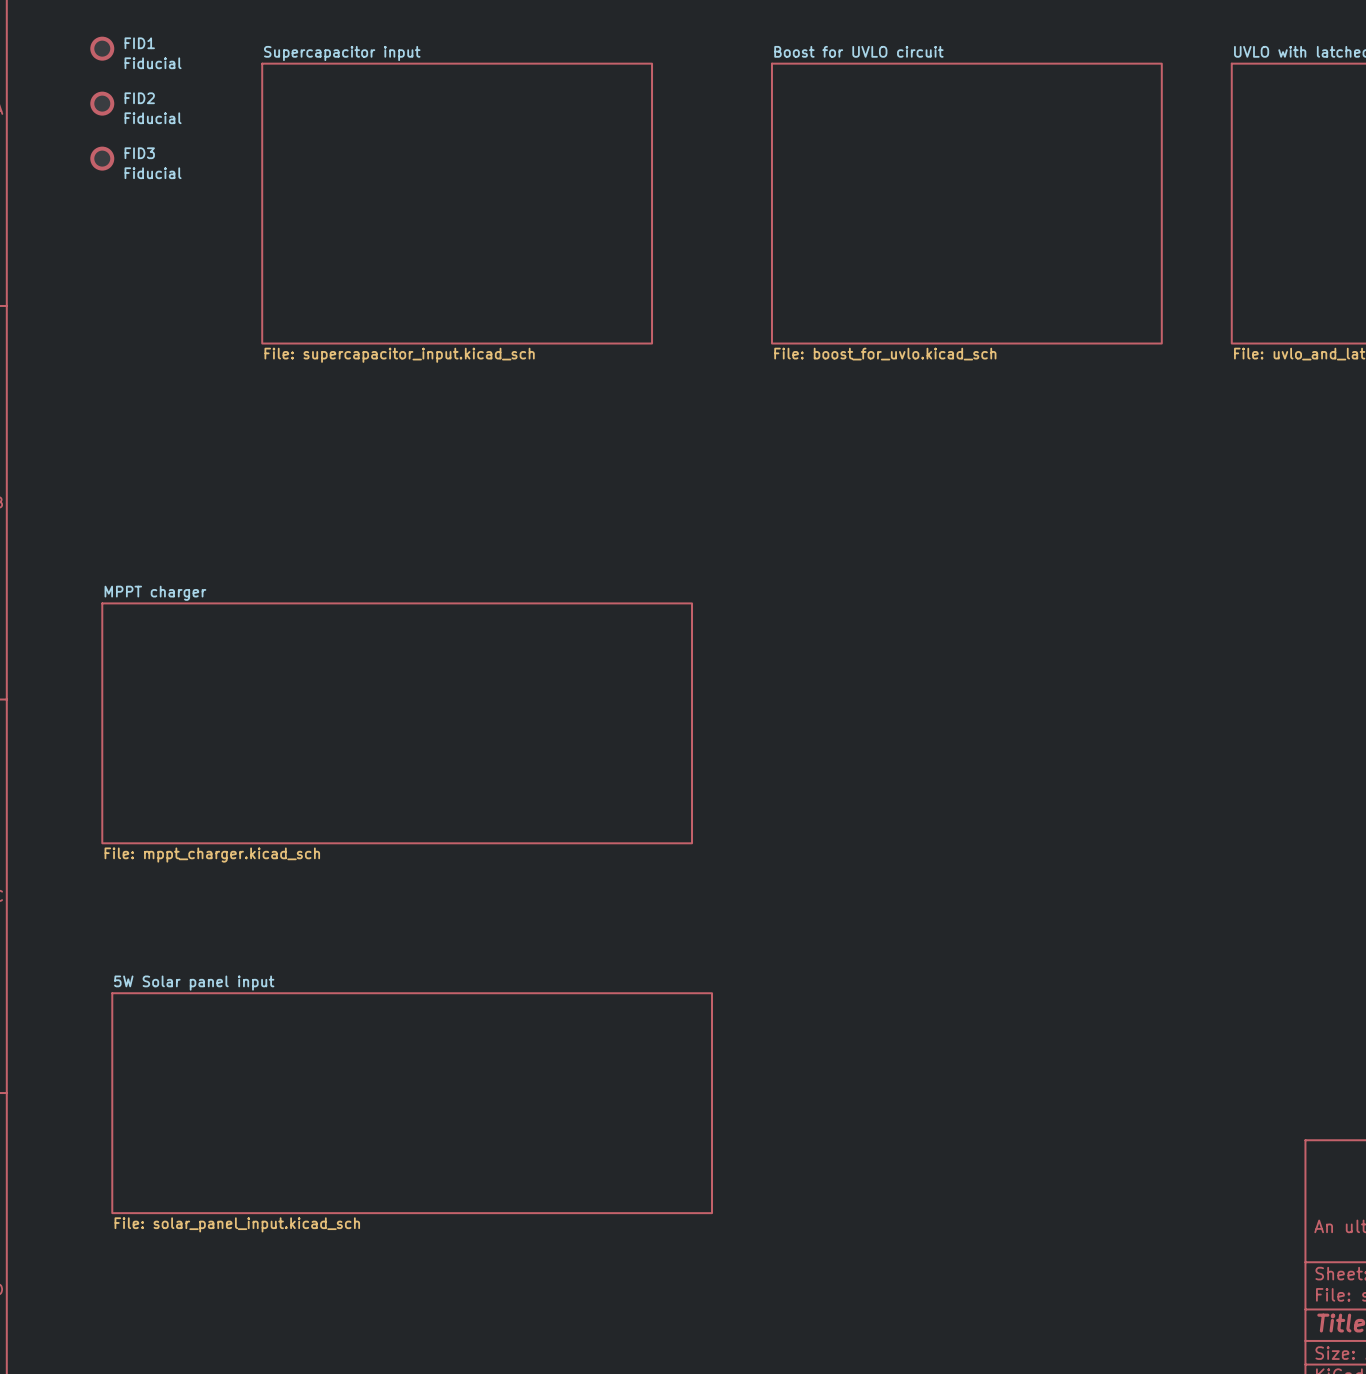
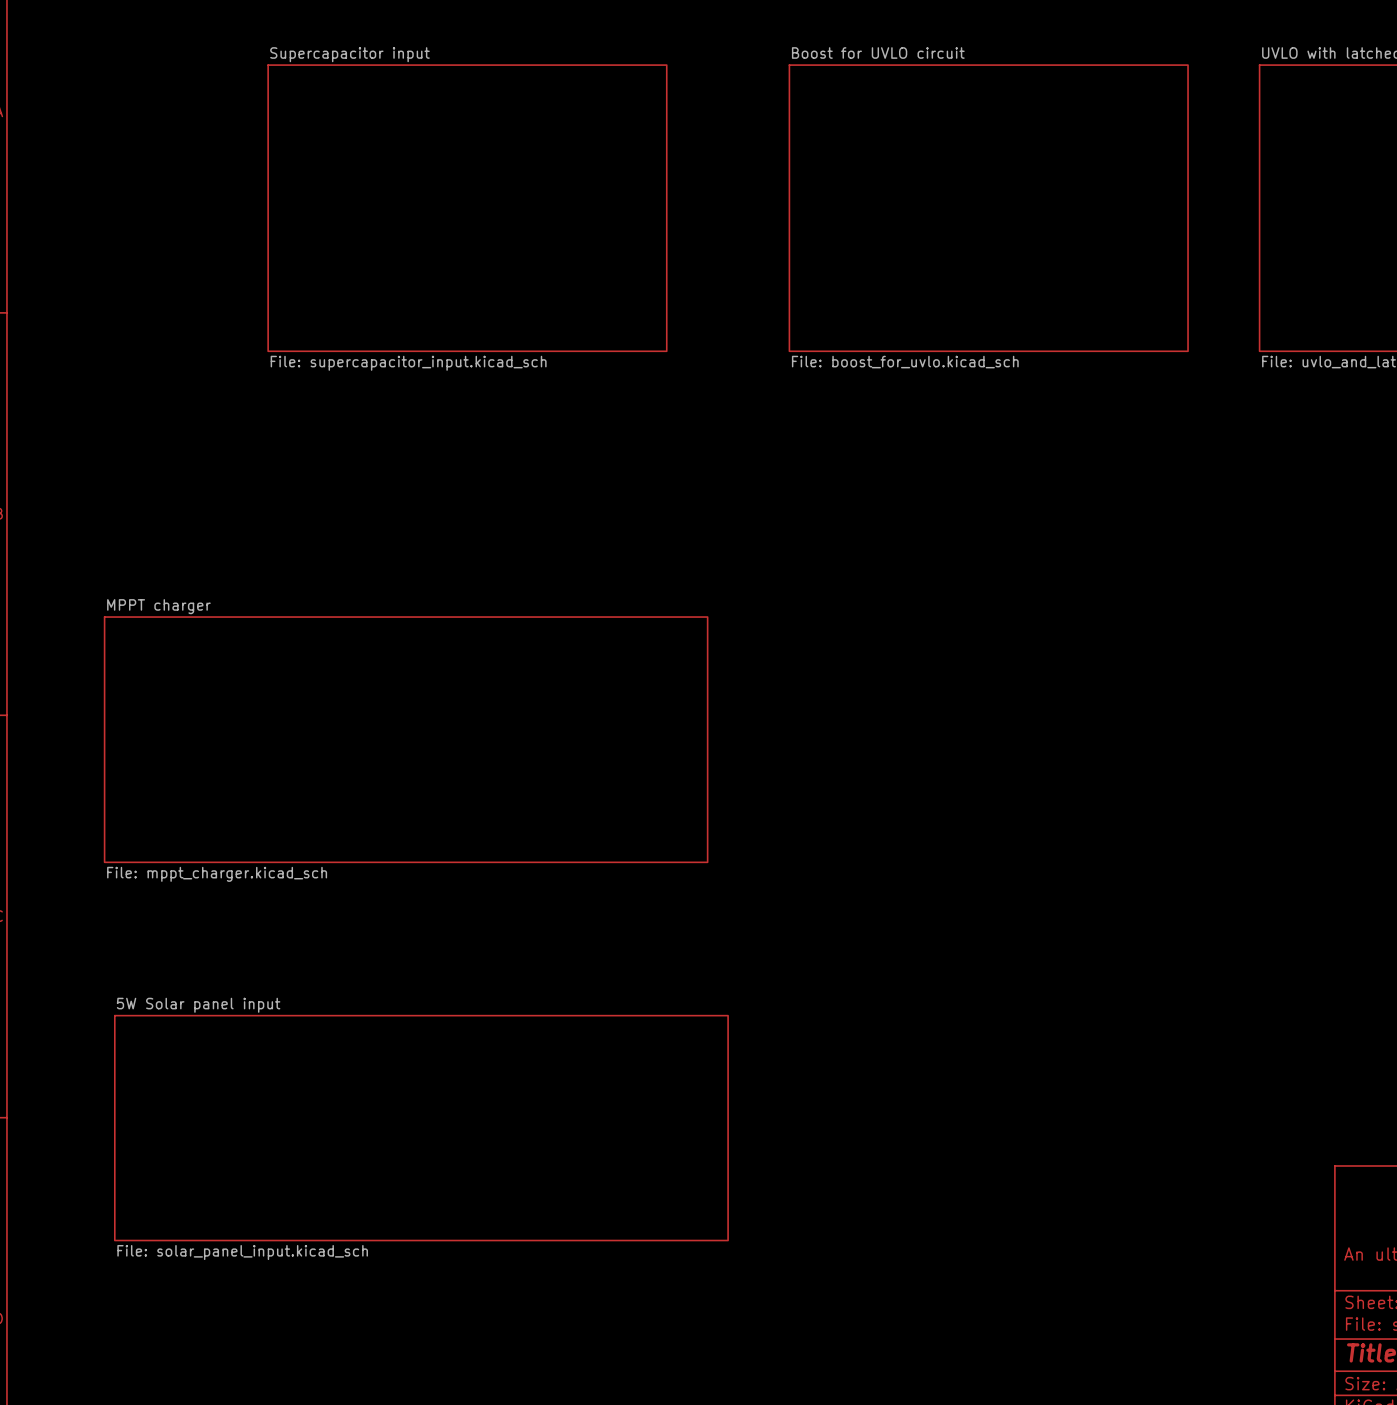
FID1: Fiducial (102, 48) -> none
FID2: Fiducial (102, 103) -> none
FID3: Fiducial (102, 158) -> none

